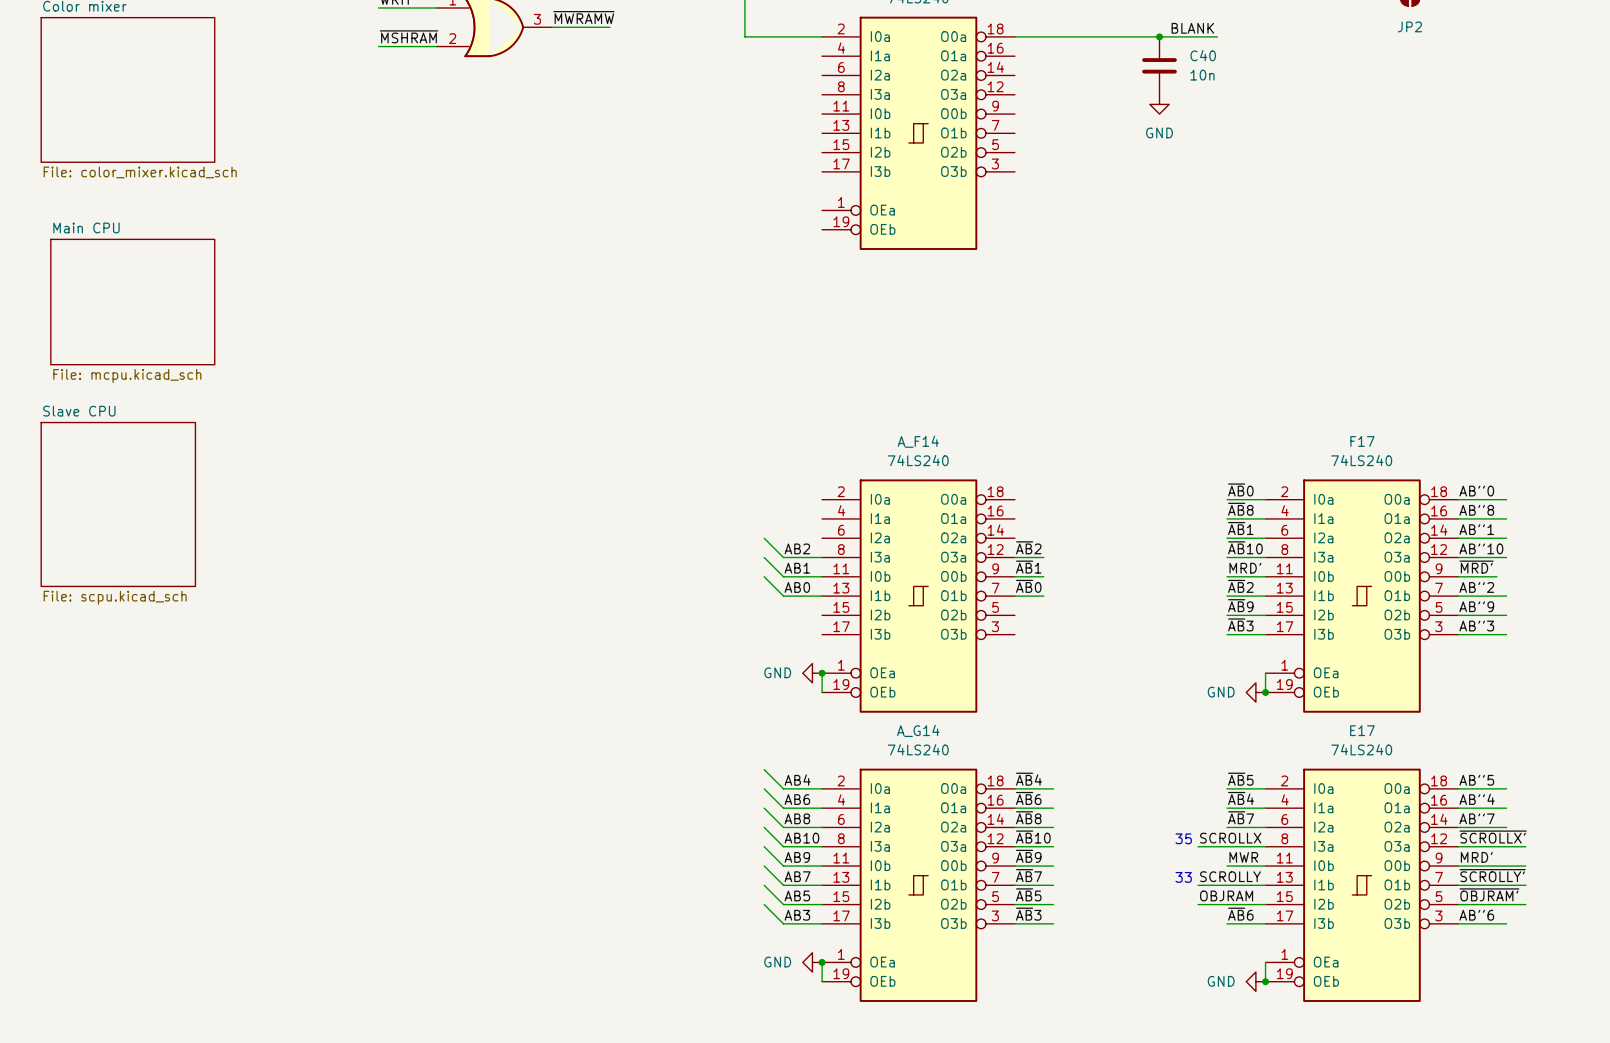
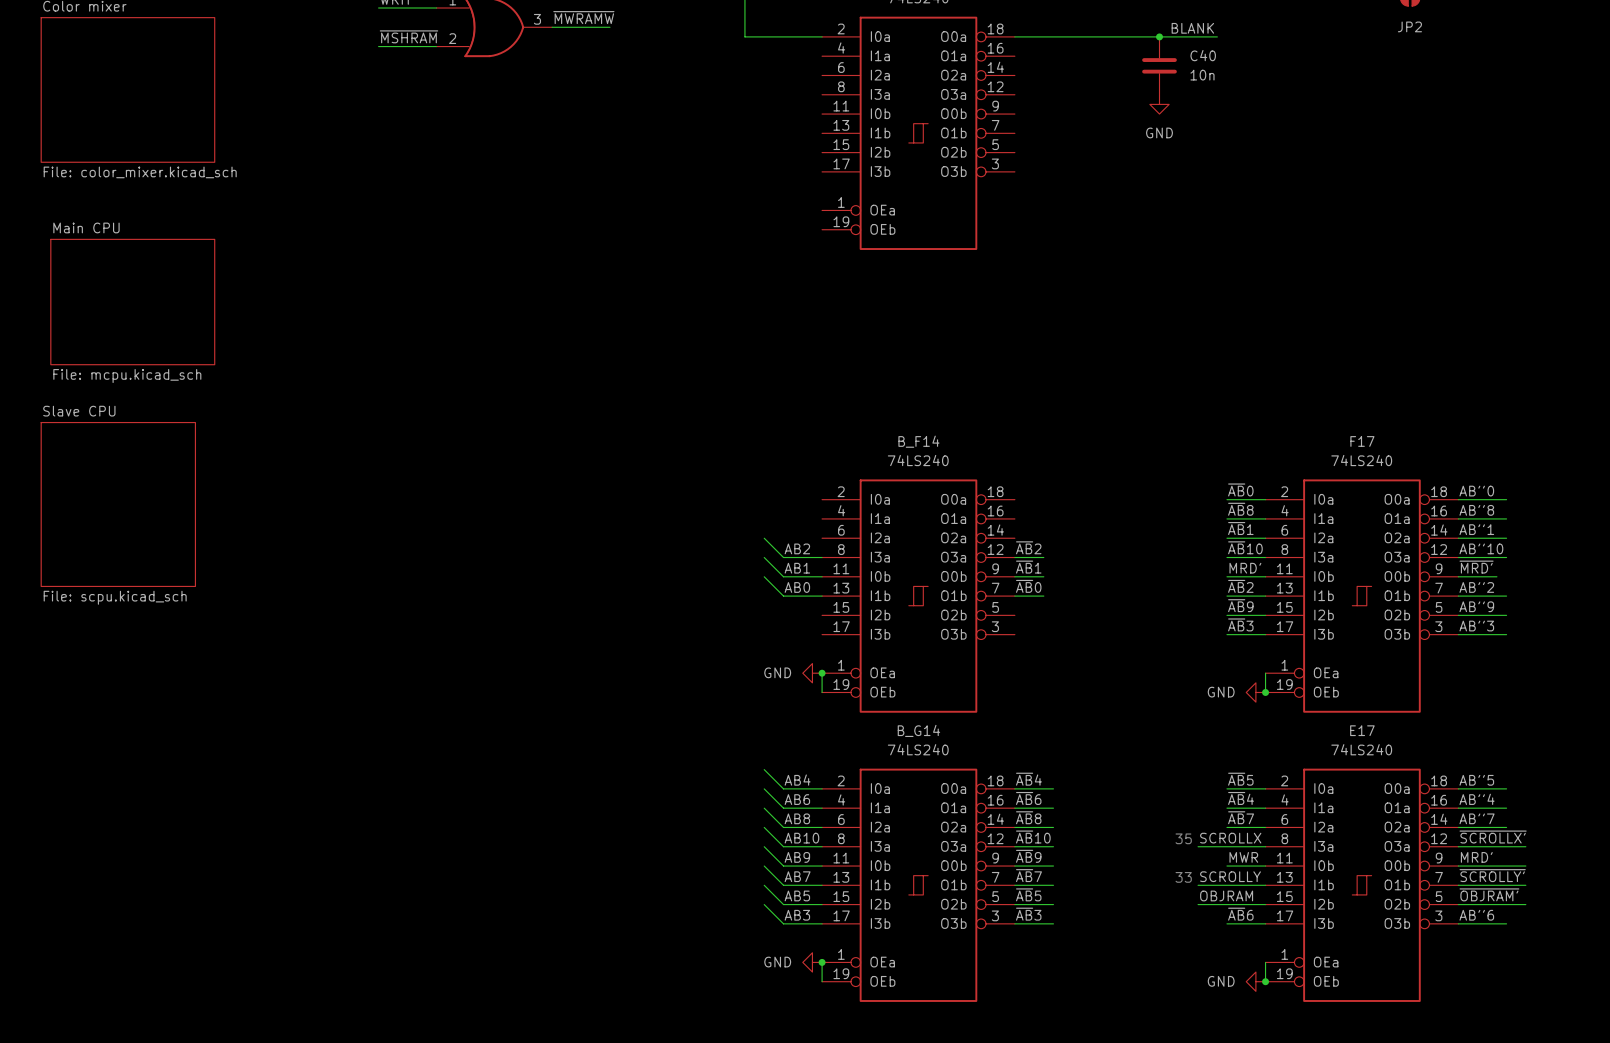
A_F14 name: A_F14 (918, 441) -> B_F14 (918, 441)
A_G14 name: A_G14 (918, 730) -> B_G14 (918, 730)

